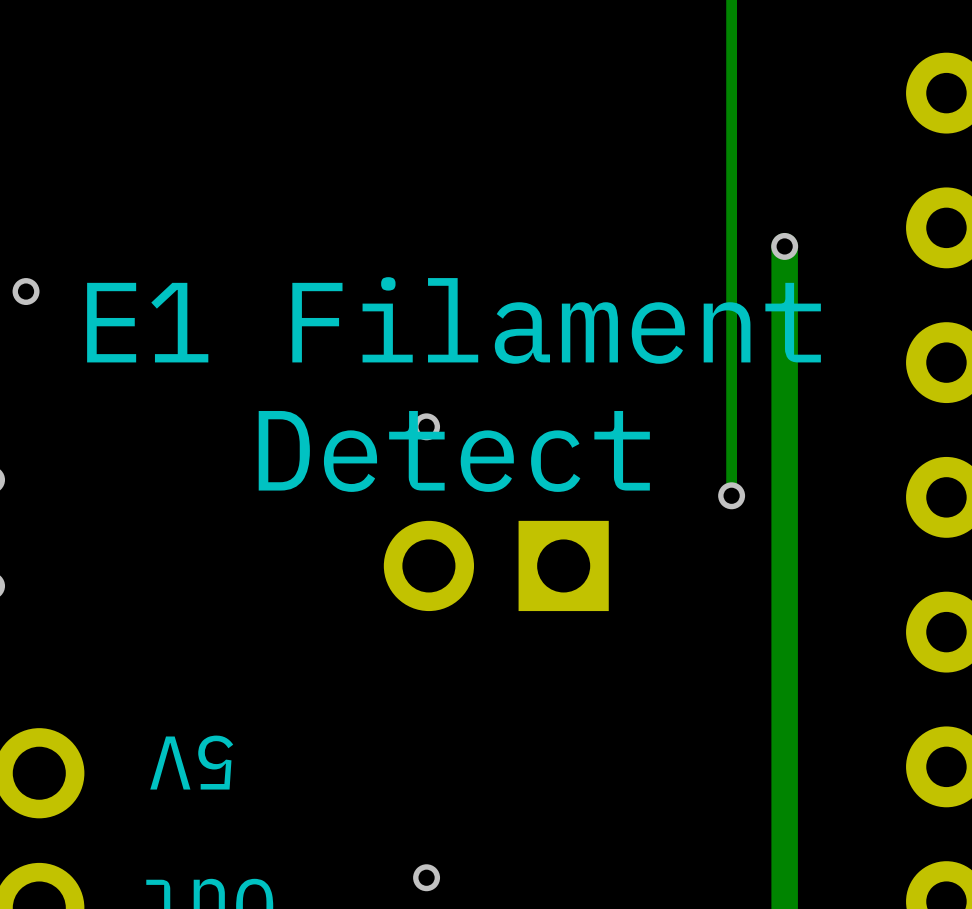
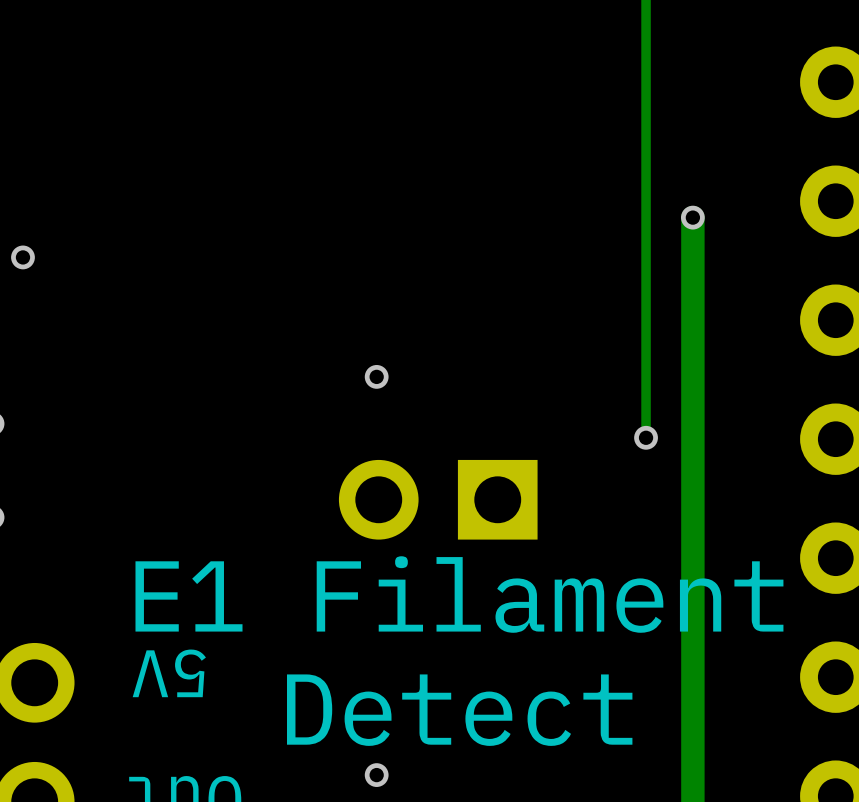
text position: E1 Filament (454, 320) -> E1 Filament (459, 594)
text position: Detect (454, 451) -> Detect (459, 710)

